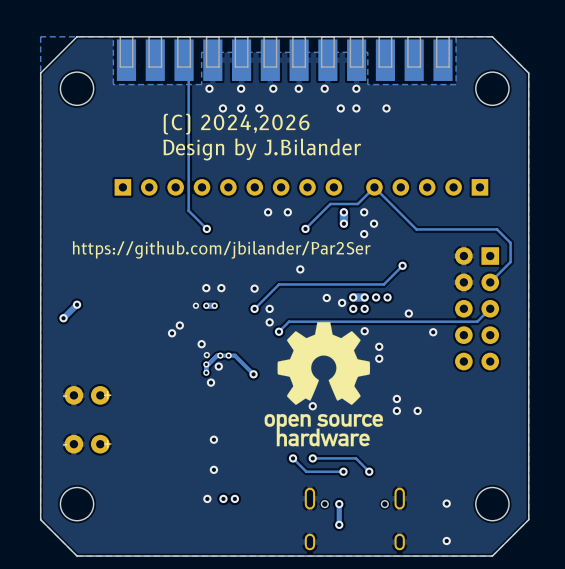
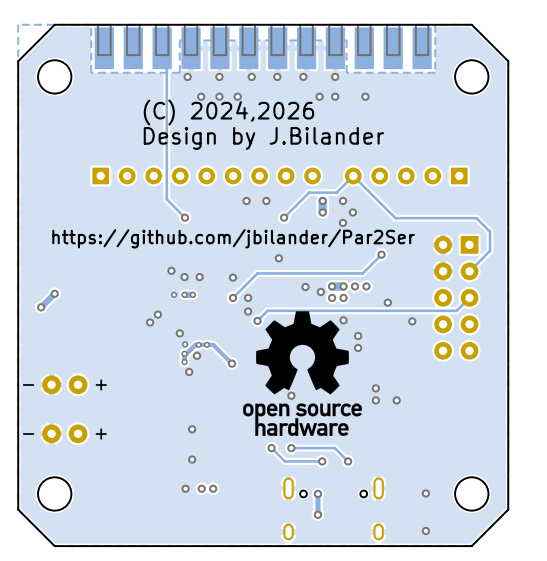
via: none -> (171, 270)

